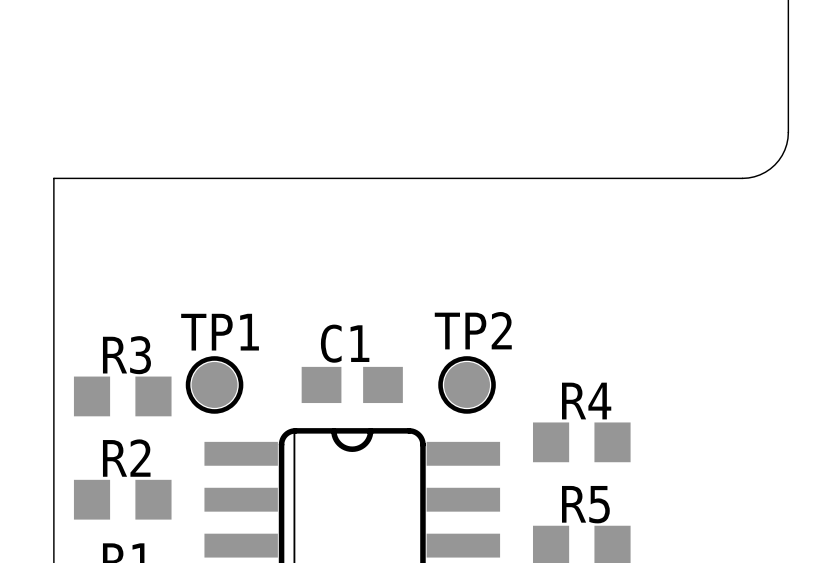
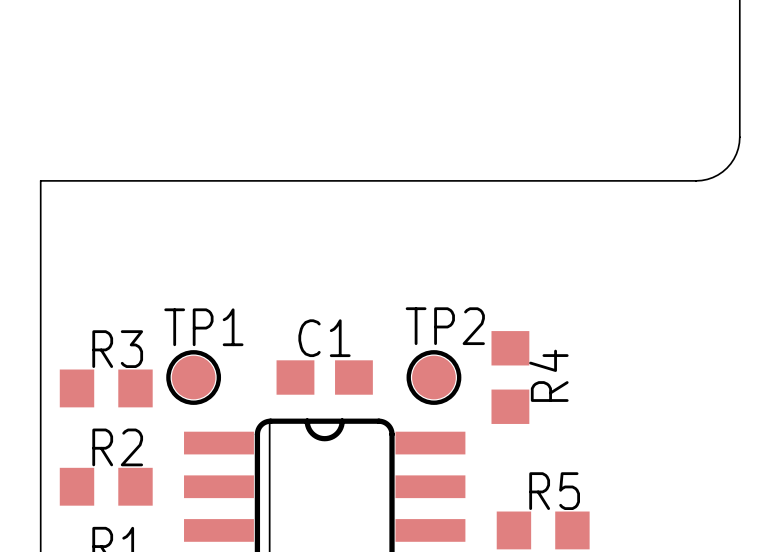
R4 rotation: 0° (581, 442) -> 90° clockwise (510, 377)
R4 position: (581, 442) -> (510, 377)

